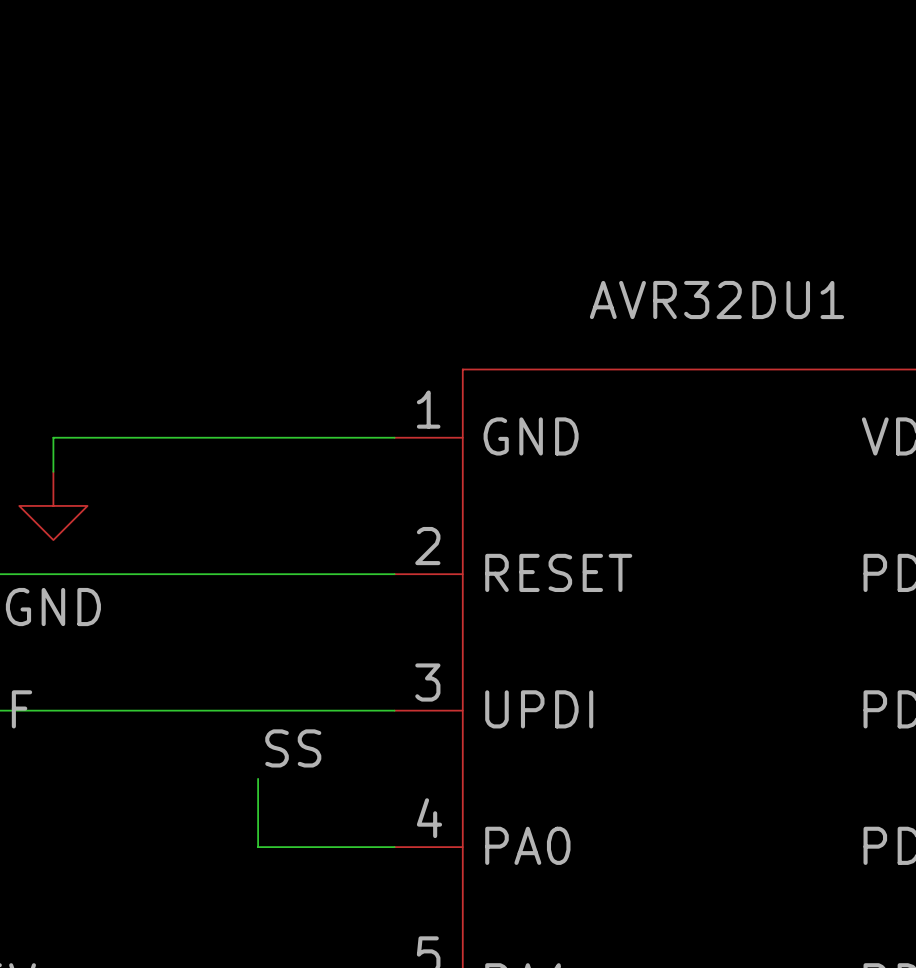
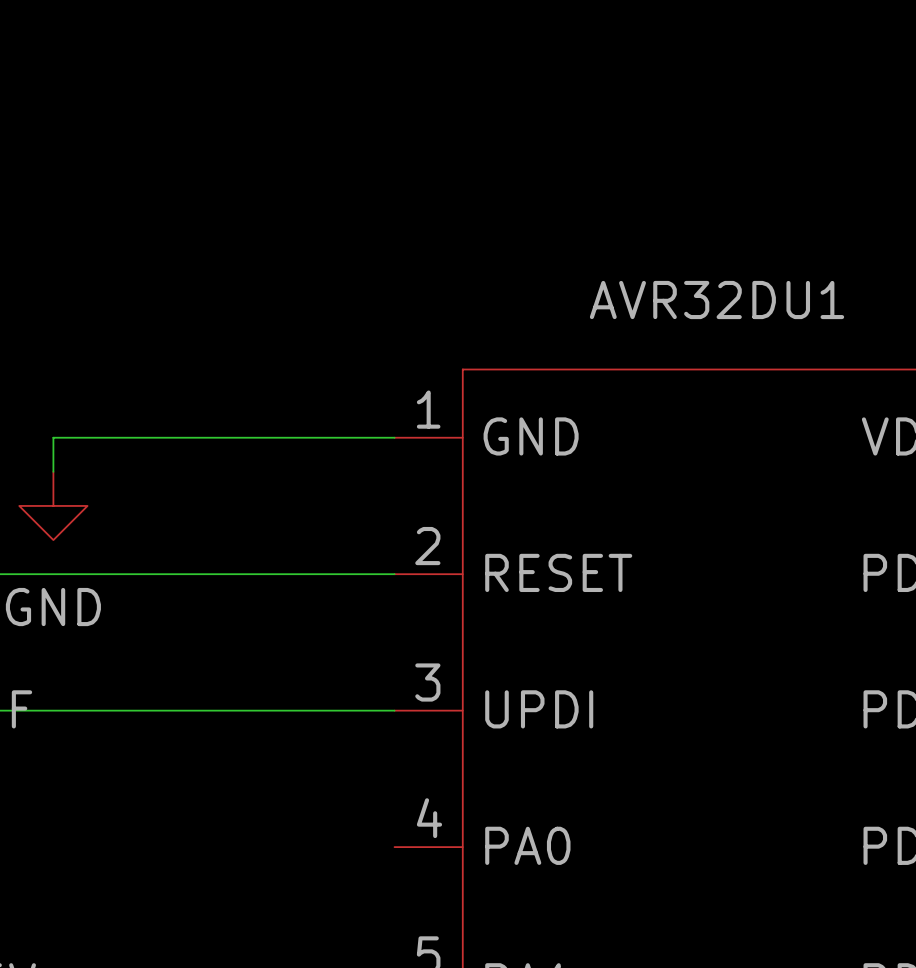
label: SS (293, 748) -> none
wire: (258, 778) (258, 847) (394, 847) -> none

